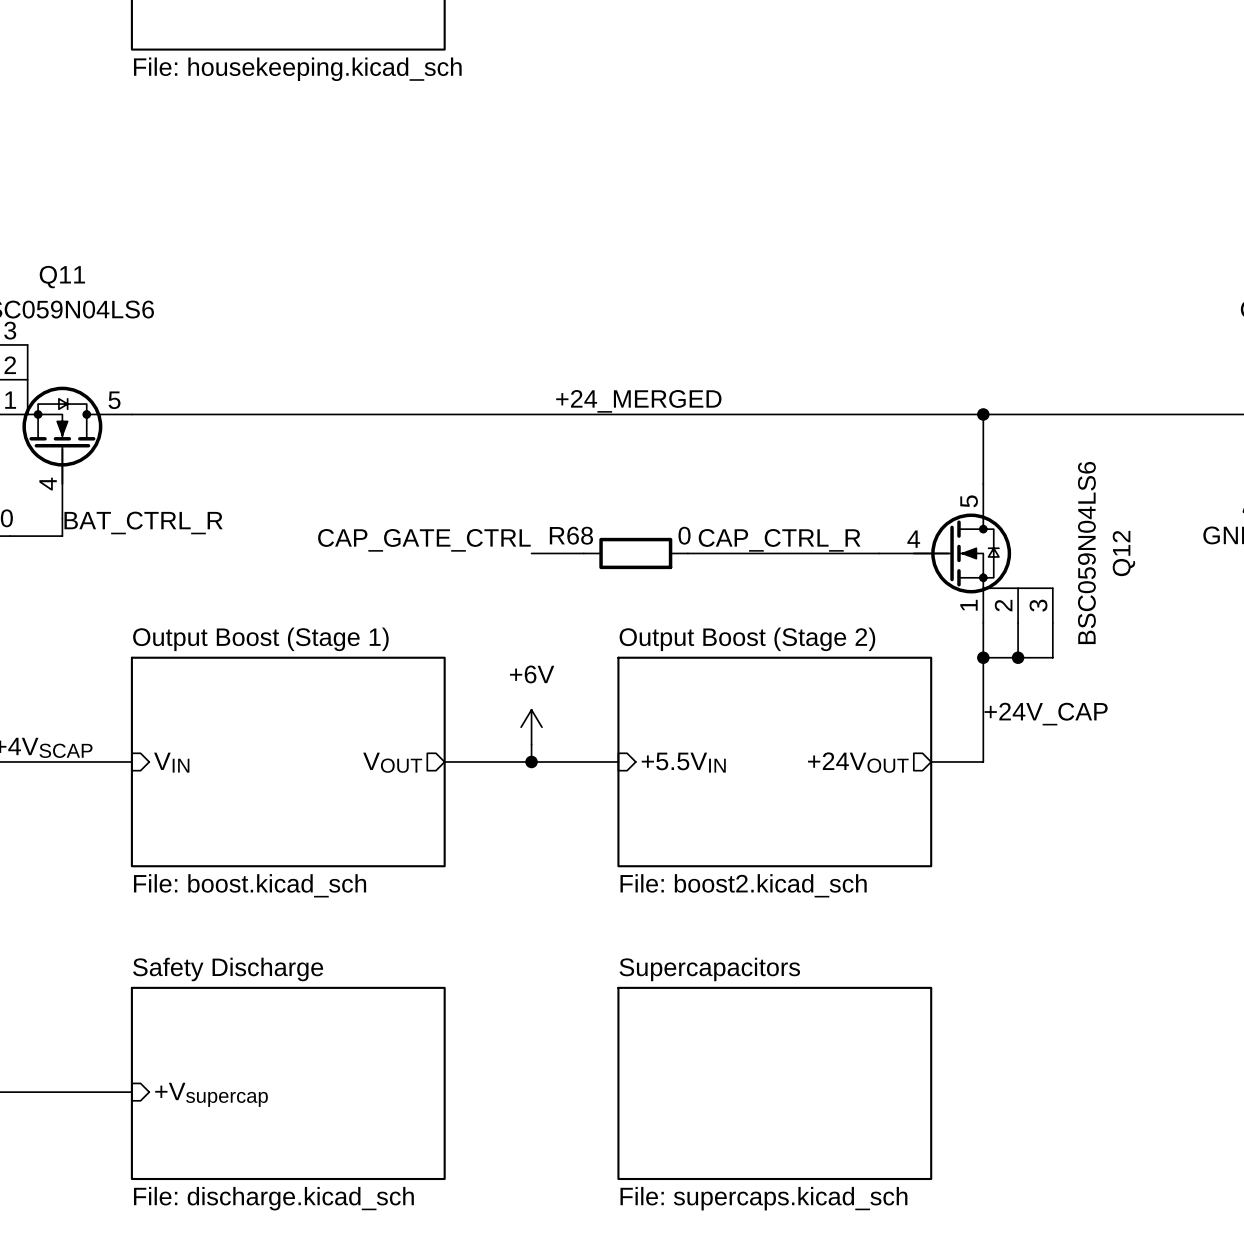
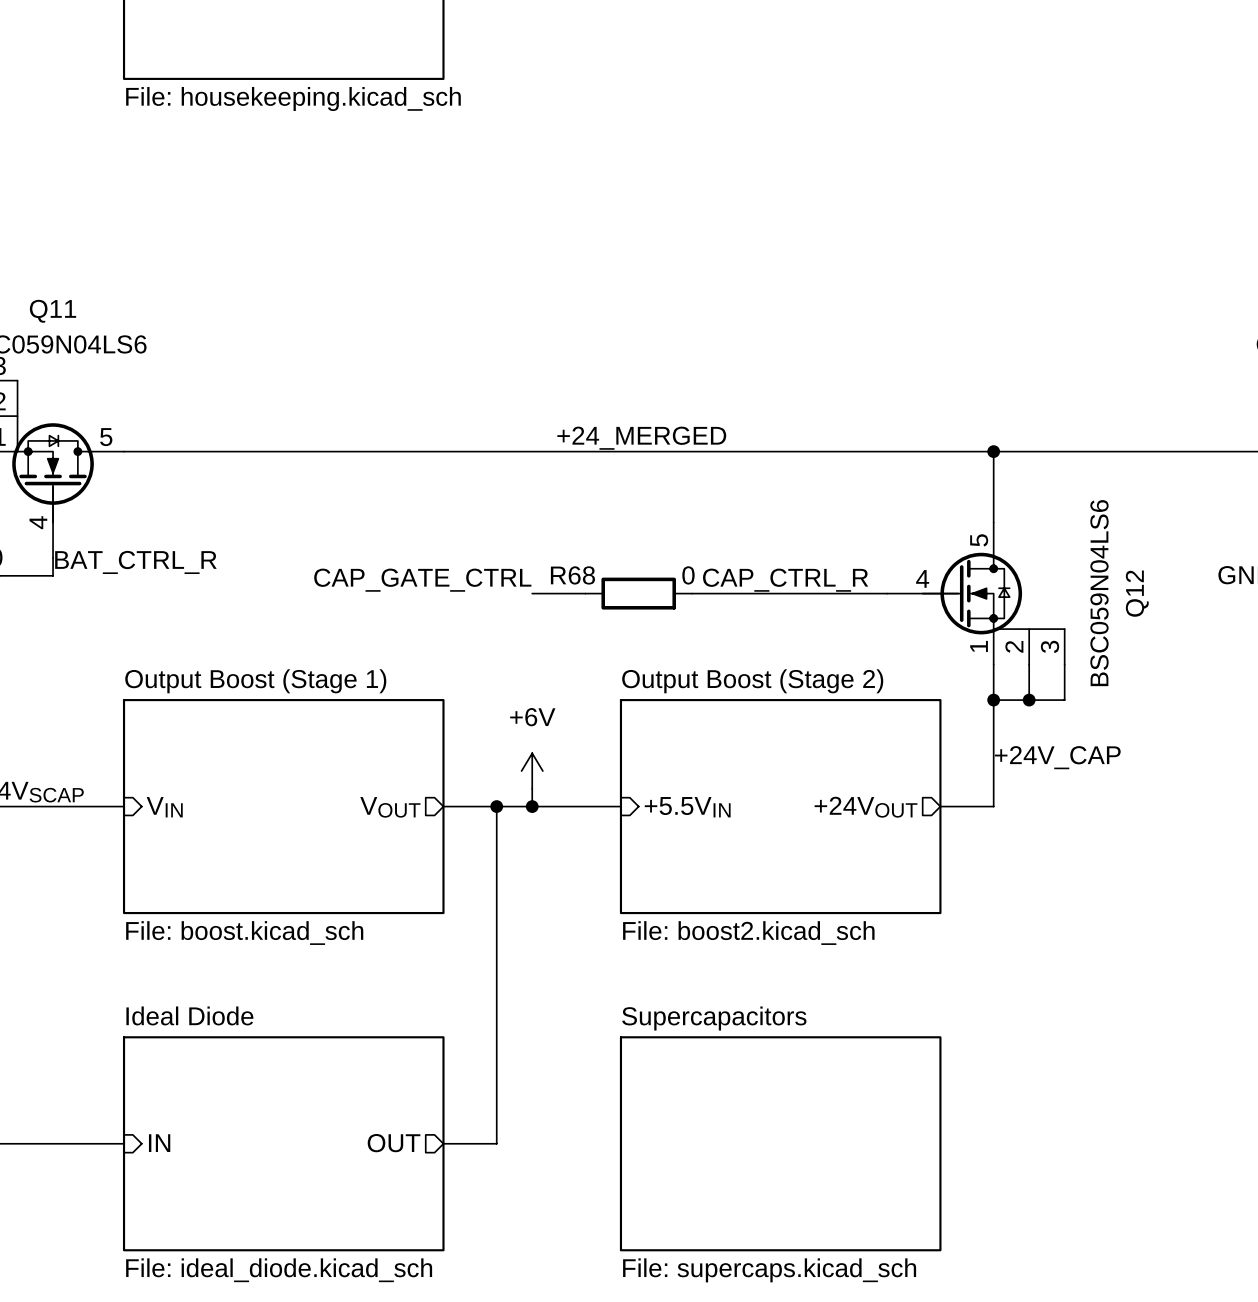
wire: none -> (496, 806) (496, 1143) (443, 1143)
junction: none -> (496, 806)
sheet Supercapacitors shape: [617, 986, 933, 1181] -> [619, 1036, 942, 1252]
sheet Safety Discharge: File: discharge.kicad_sch (288, 1083) -> none
sheet pin: none -> OUT (394, 1143)
sheet Ideal Diode: none -> File: ideal_diode.kicad_sch (283, 1143)
sheet pin: +Vsupercap (211, 1094) -> IN (159, 1143)

